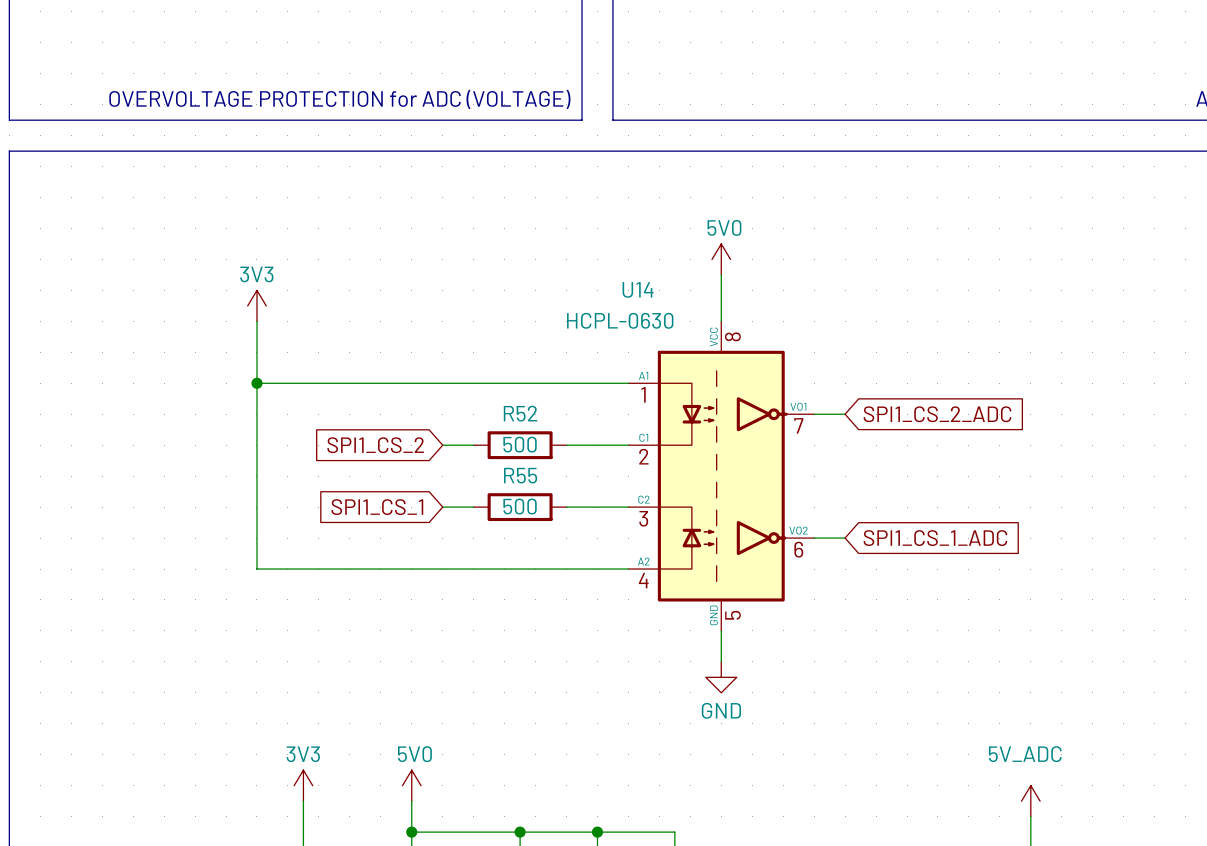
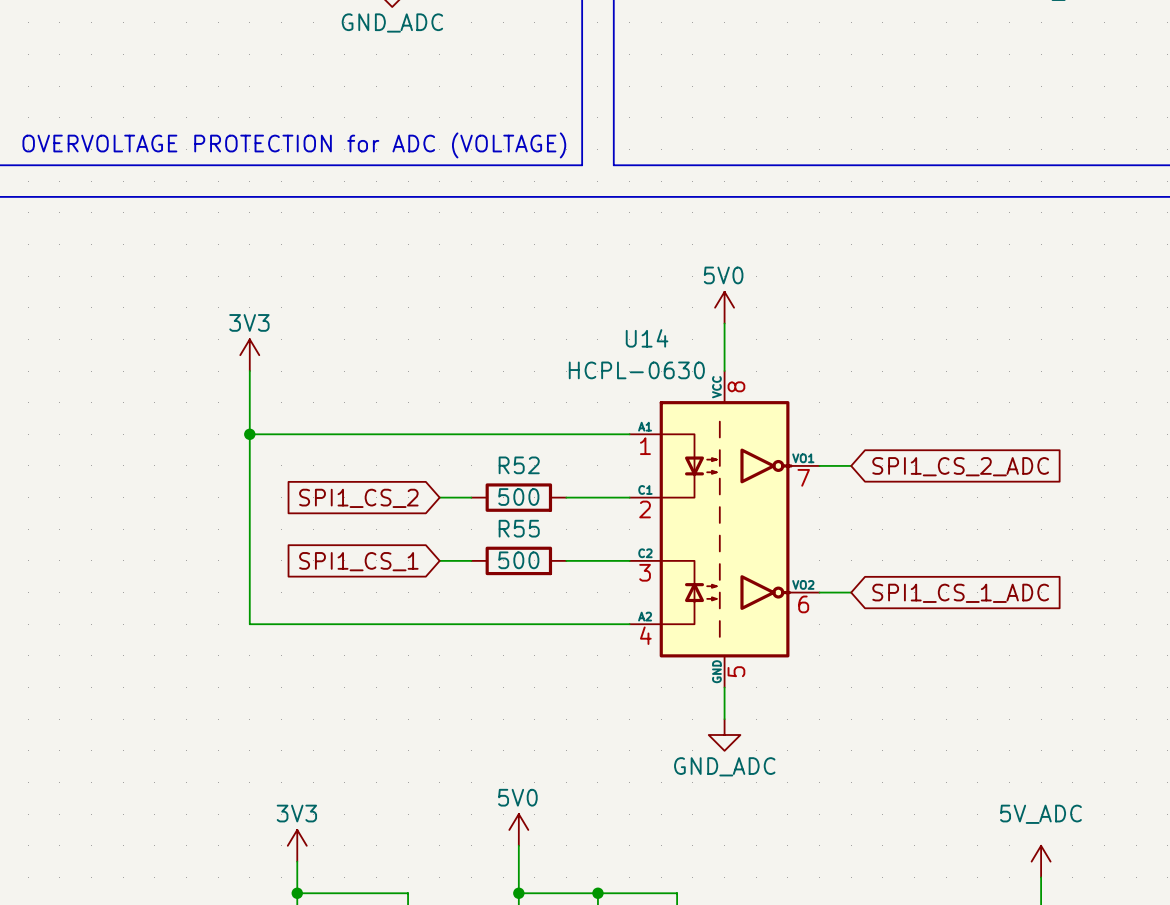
power symbol: GND (721, 677) -> GND_ADC (724, 735)
power symbol position: 5V0 (411, 785) -> 5V0 (518, 829)
wire: (411, 801) (411, 832) (520, 832) -> (518, 845) (518, 893)
wire: none -> (297, 893) (408, 893)
junction: none -> (297, 893)
junction: (411, 832) -> none

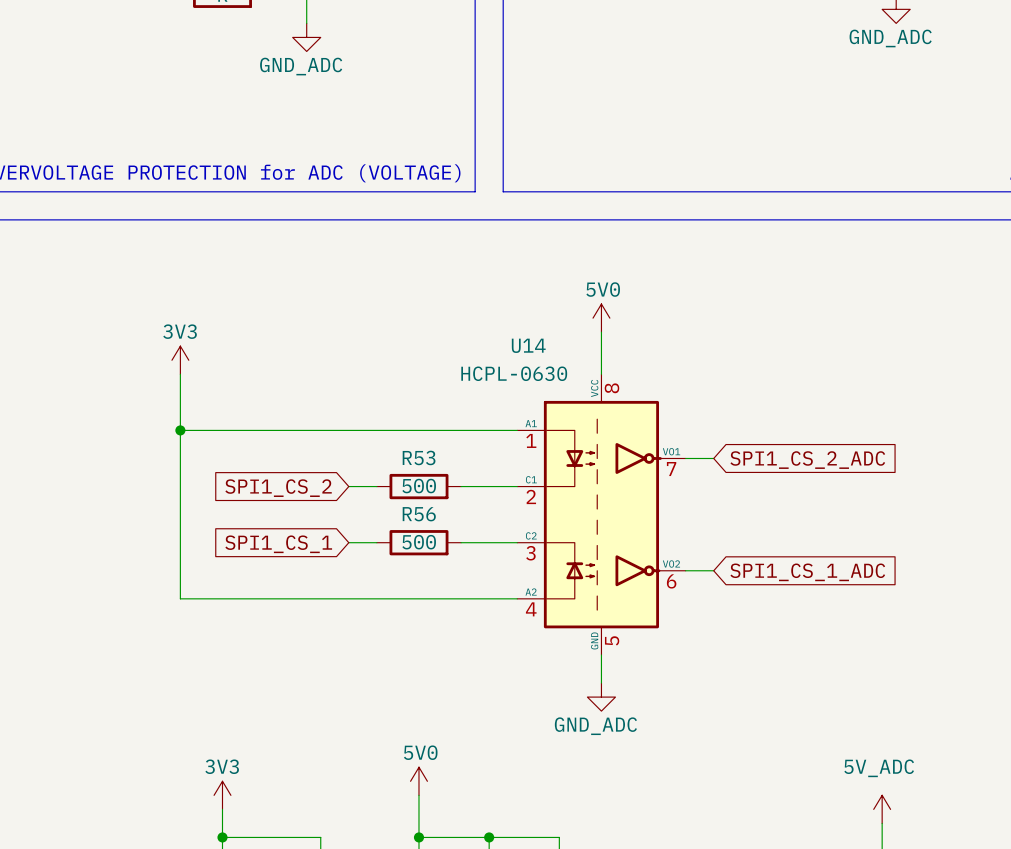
R52 name: R52 (519, 465) -> R53 (419, 457)
R55 name: R55 (519, 528) -> R56 (419, 514)

